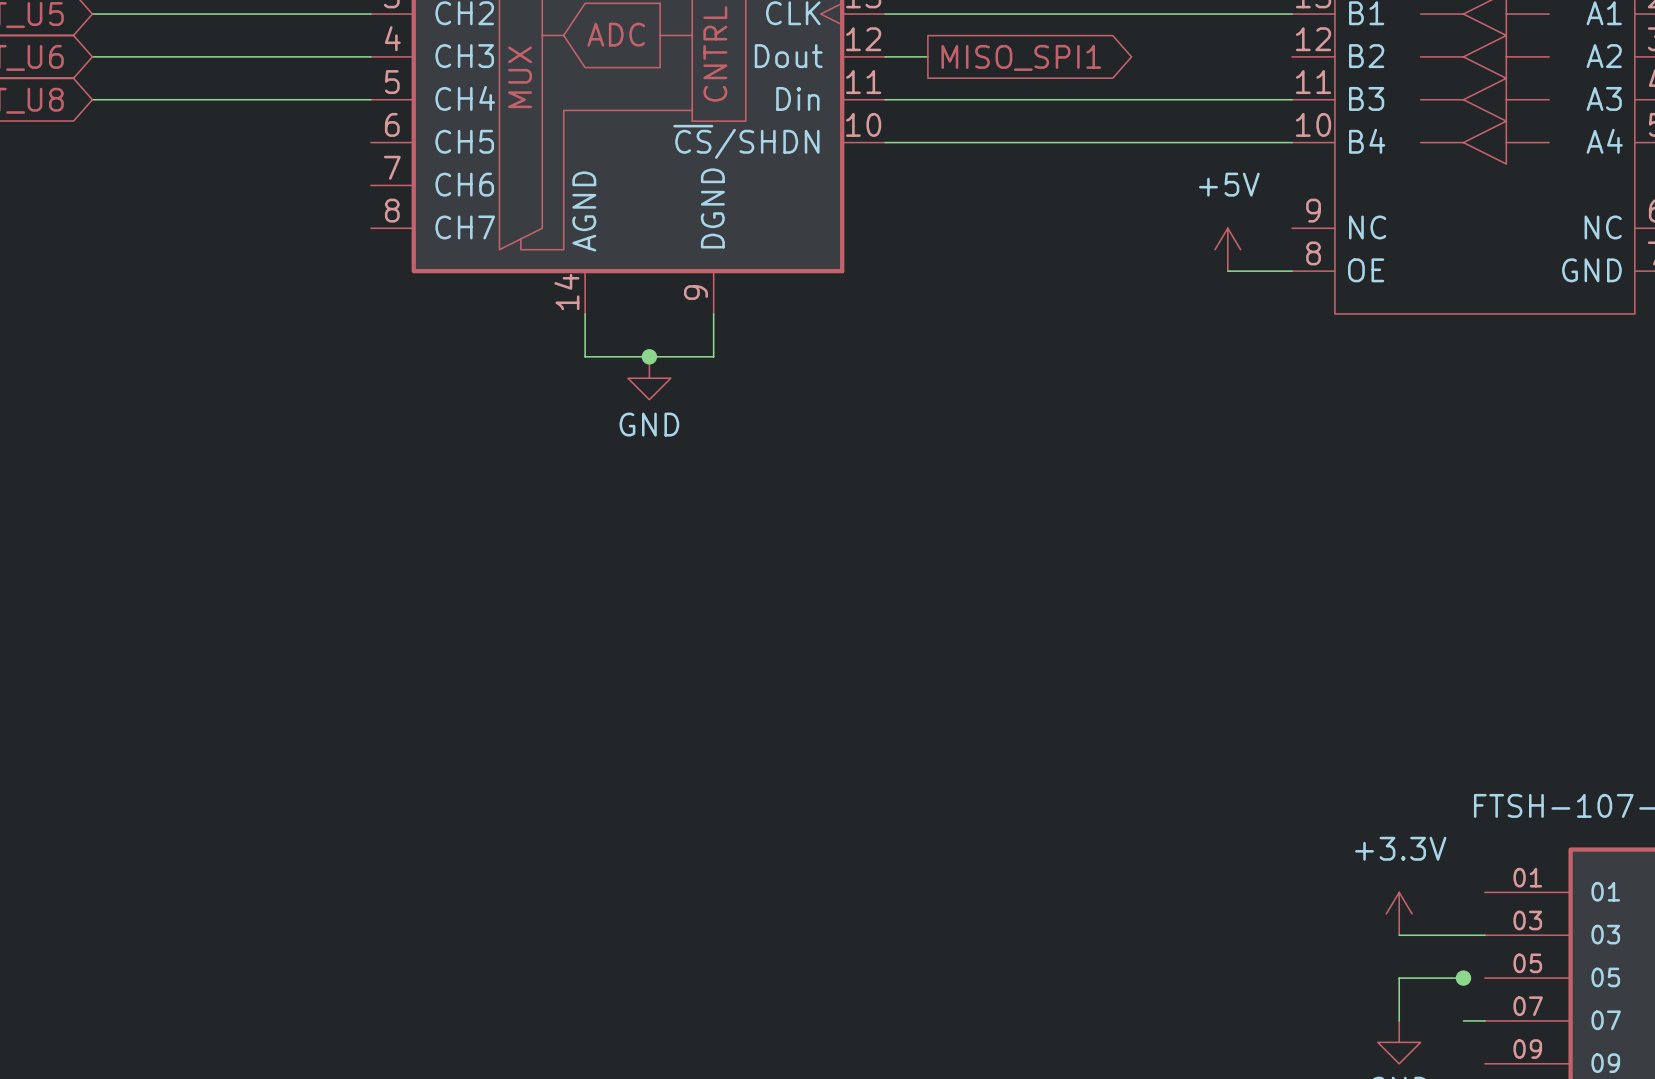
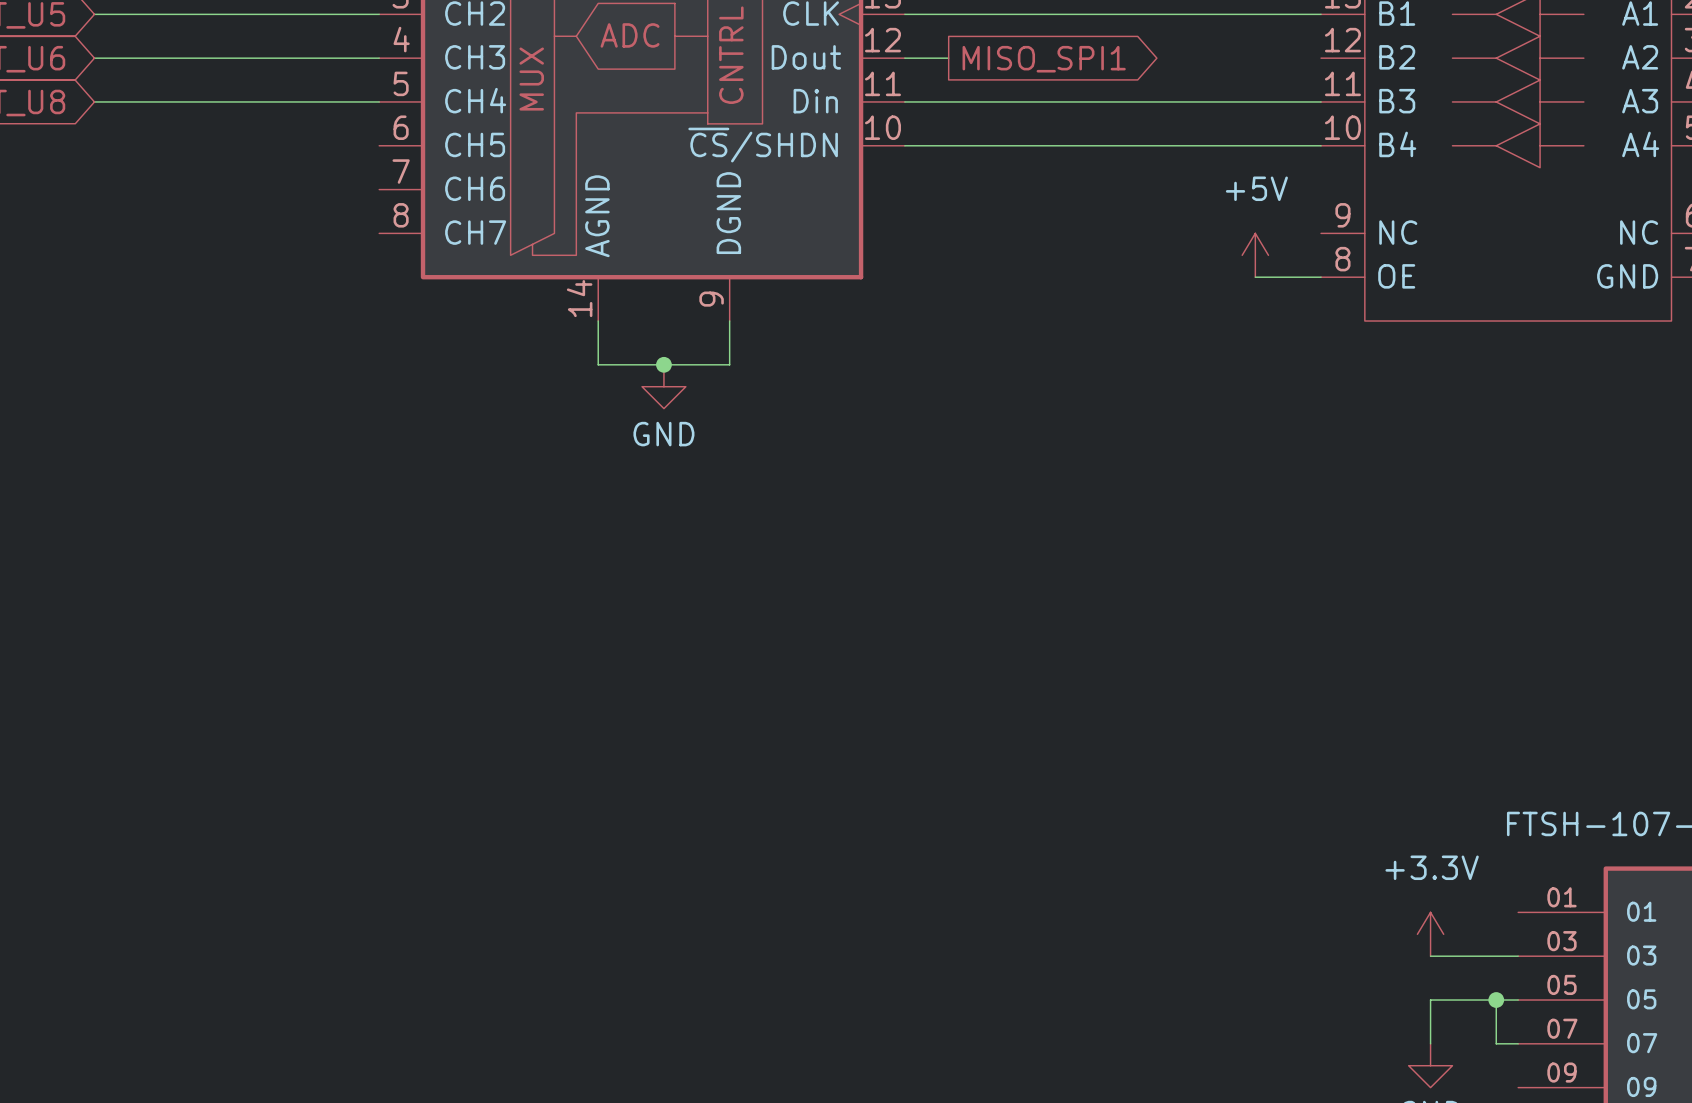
wire: none -> (1518, 1000) (1496, 1000) (1496, 1043)

